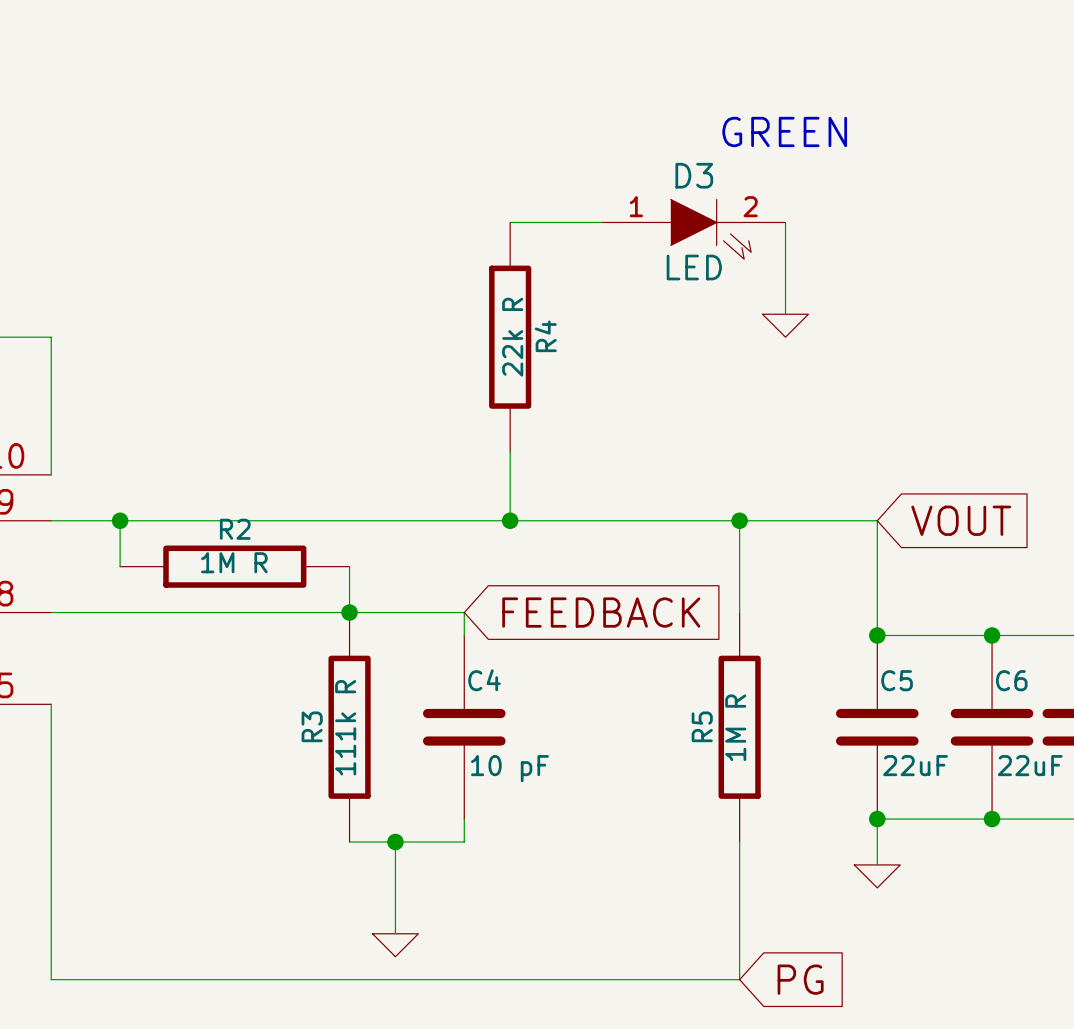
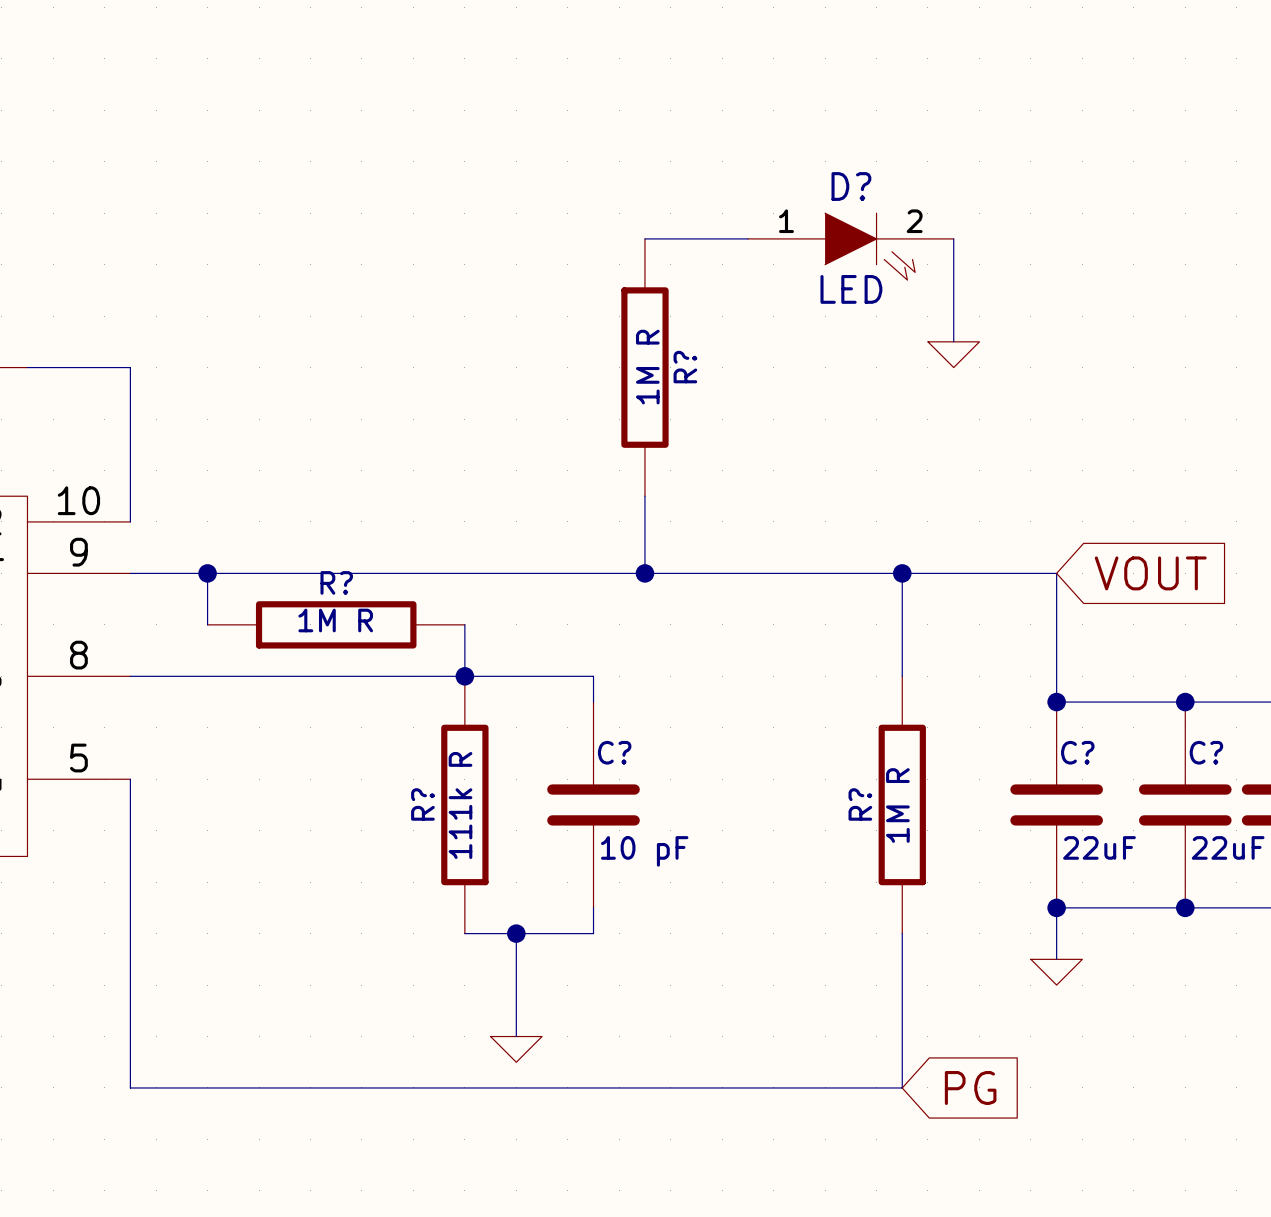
text: GREEN (784, 131) -> none
D3 name: D3 (694, 175) -> D? (851, 186)
R4 name: R4 (545, 336) -> R? (685, 367)
R4 value: 22k R (512, 337) -> 1M R (647, 367)
R2 name: R2 (235, 529) -> R? (336, 582)
global label: FEEDBACK (601, 612) -> none
C4 name: C4 (484, 680) -> C? (614, 752)
C5 name: C5 (897, 680) -> C? (1077, 752)
C6 name: C6 (1011, 680) -> C? (1206, 752)
R3 name: R3 (312, 726) -> R? (422, 804)
R5 name: R5 (702, 726) -> R? (860, 804)

